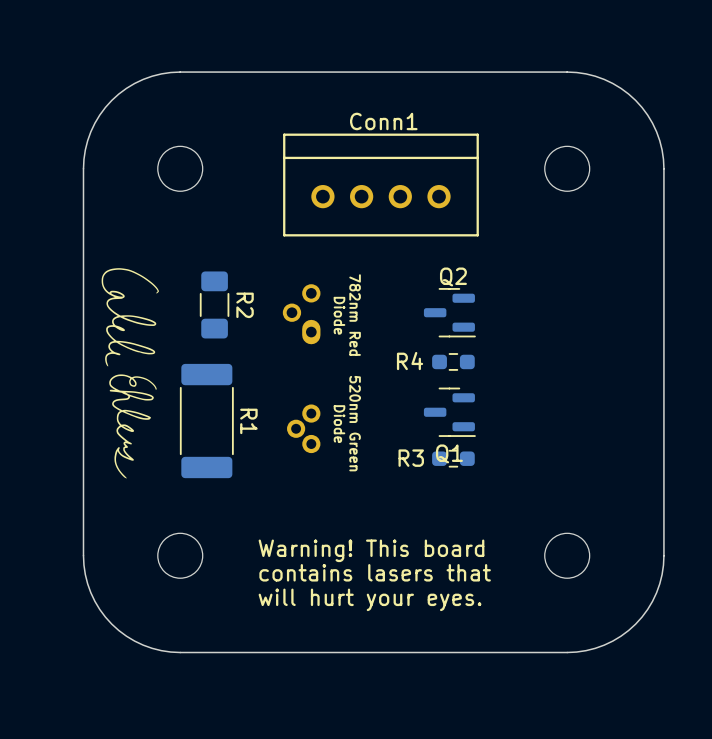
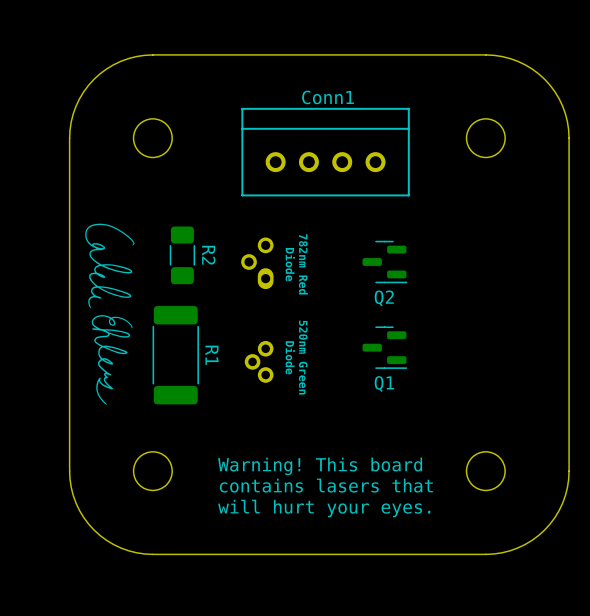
Q2 name position: Q2 (453, 276) -> Q2 (384, 298)
R4: (453, 361) -> none
R3: (453, 458) -> none

